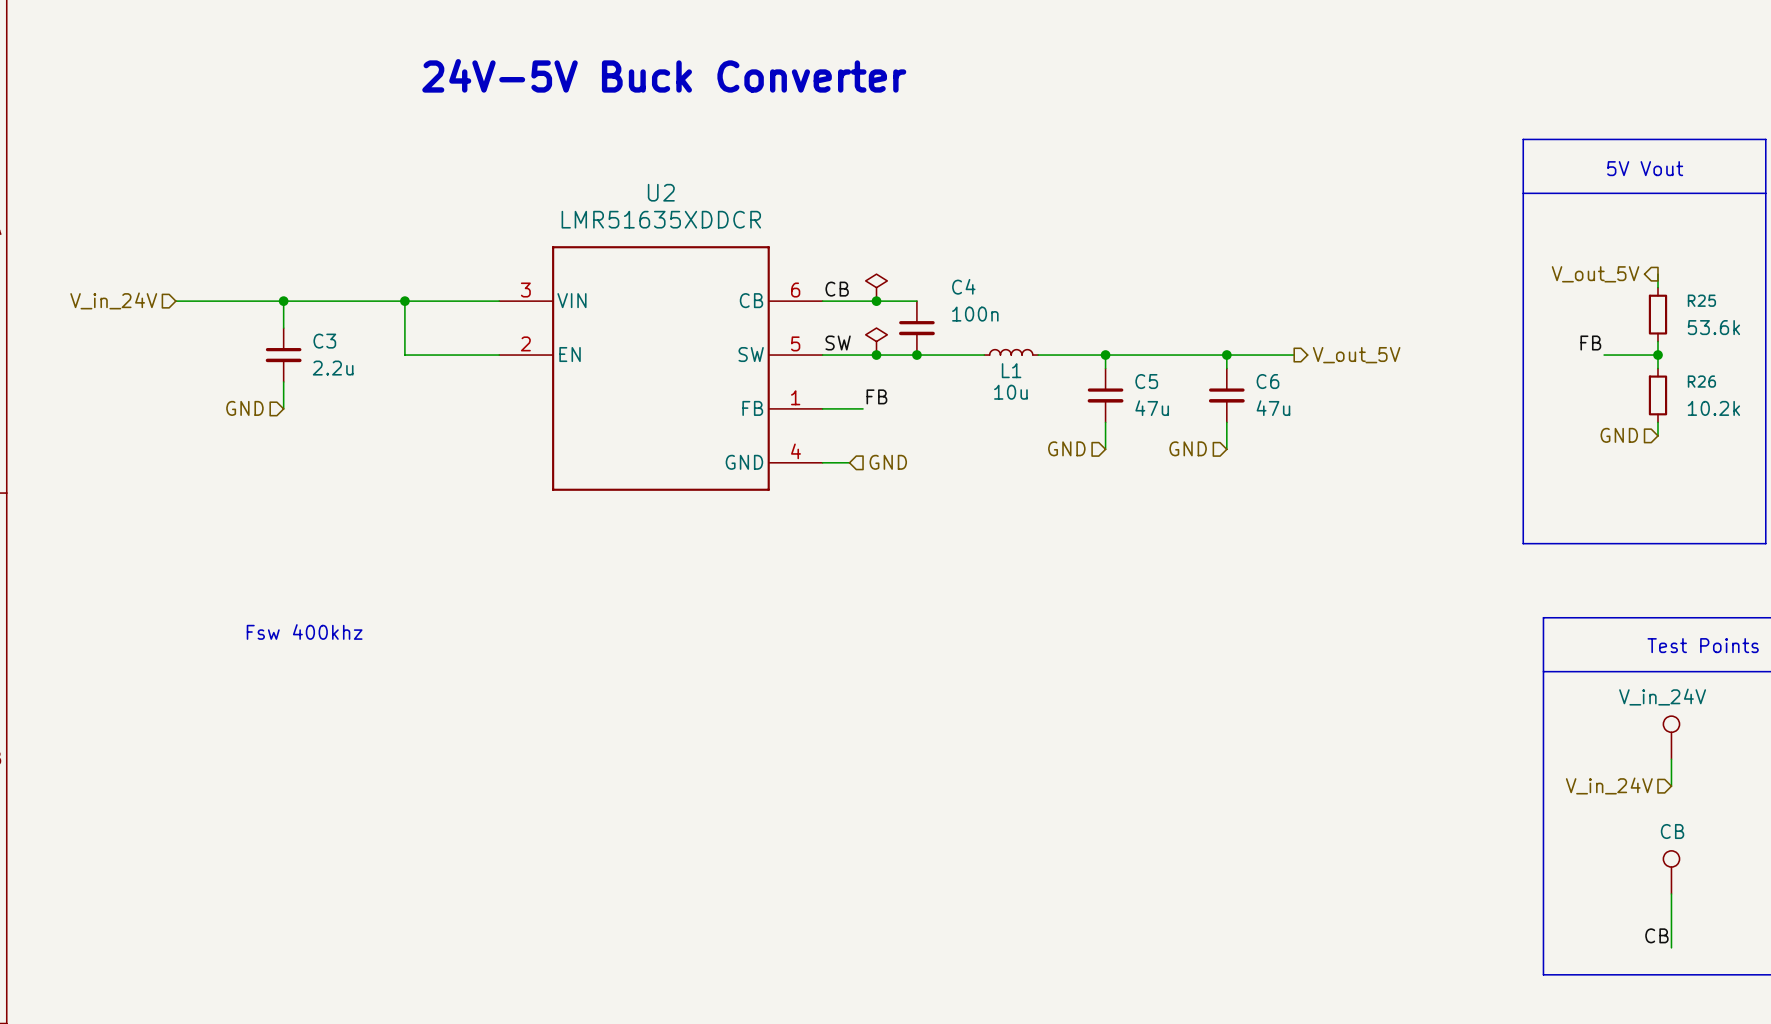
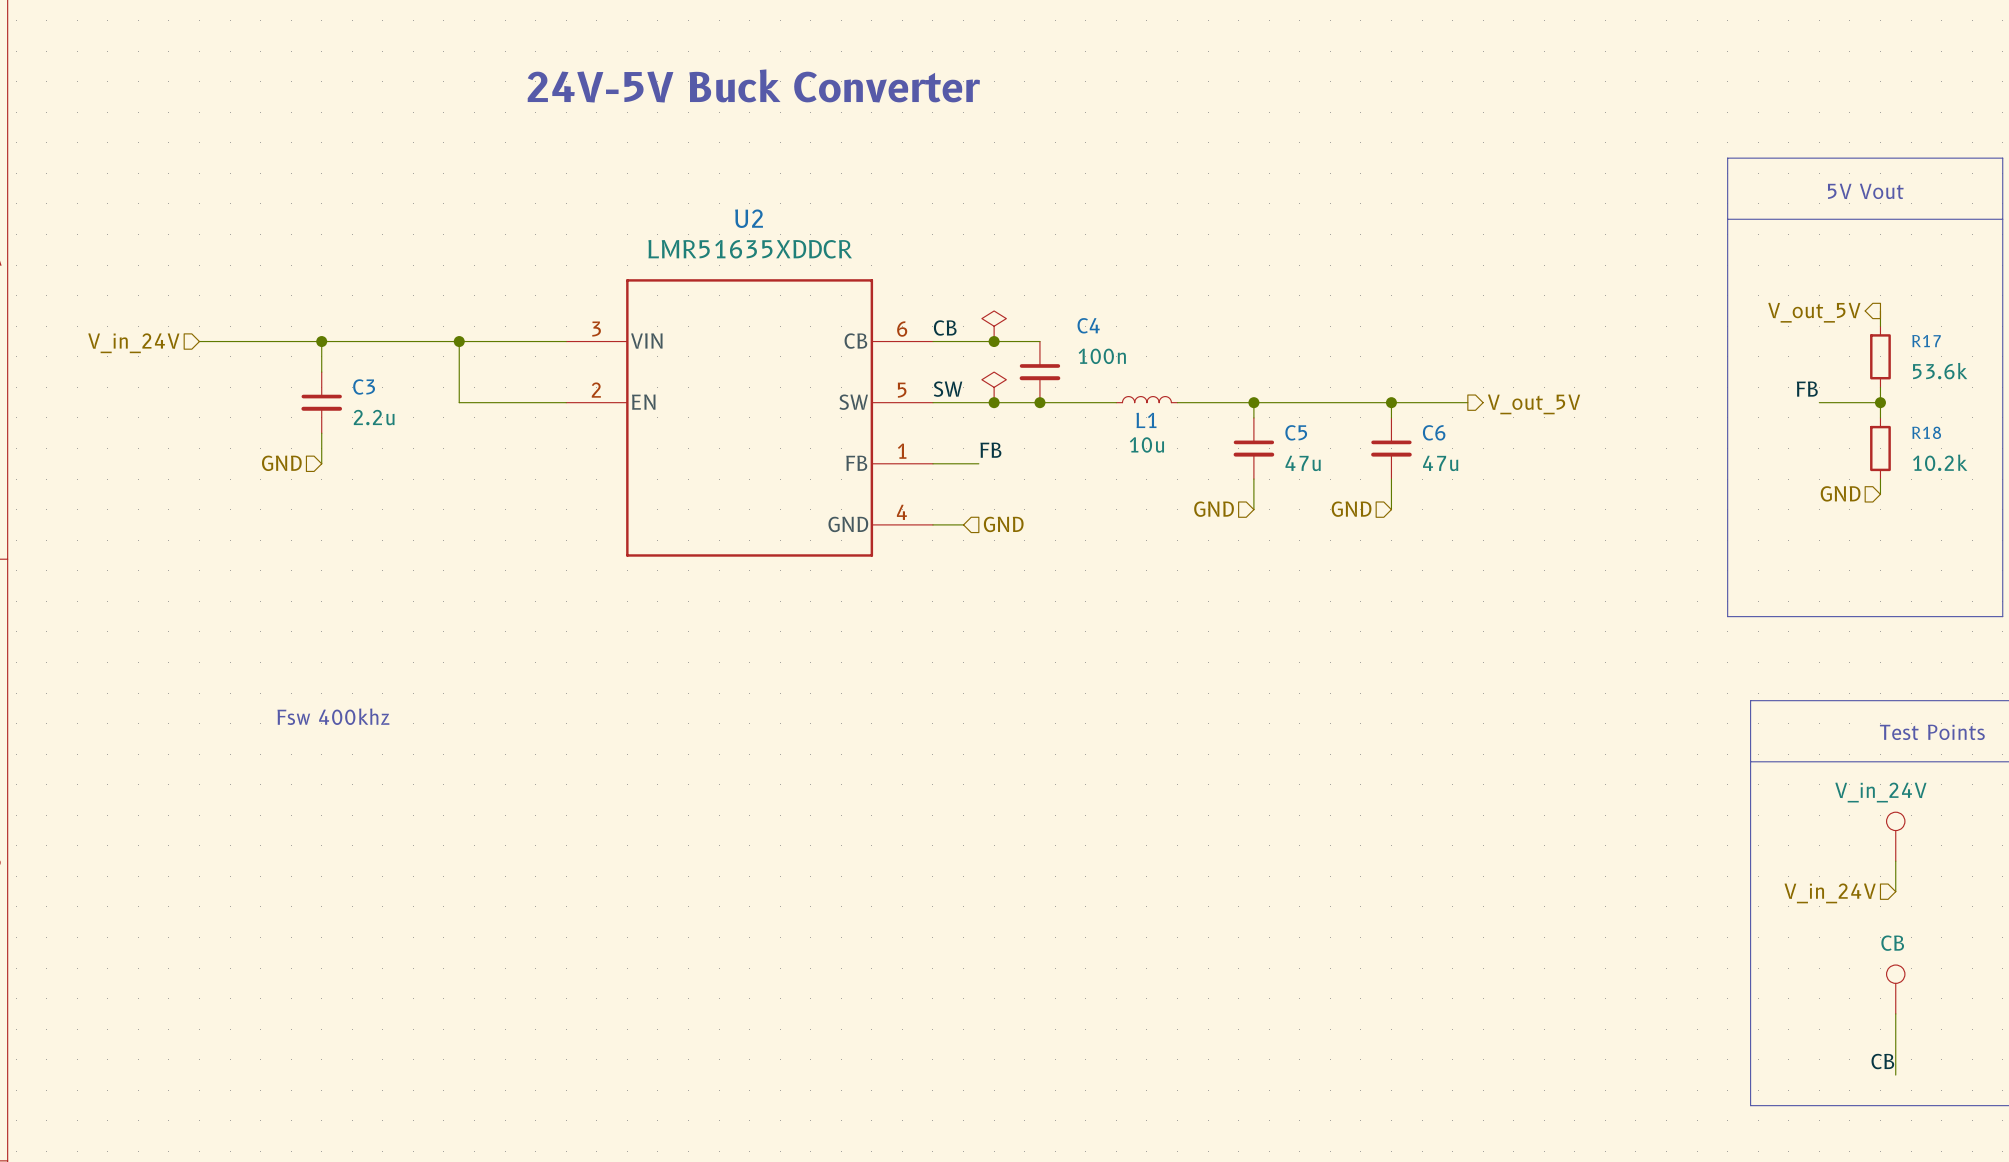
R25 name: R25 (1701, 300) -> R17 (1926, 341)
R26 name: R26 (1701, 381) -> R18 (1926, 432)

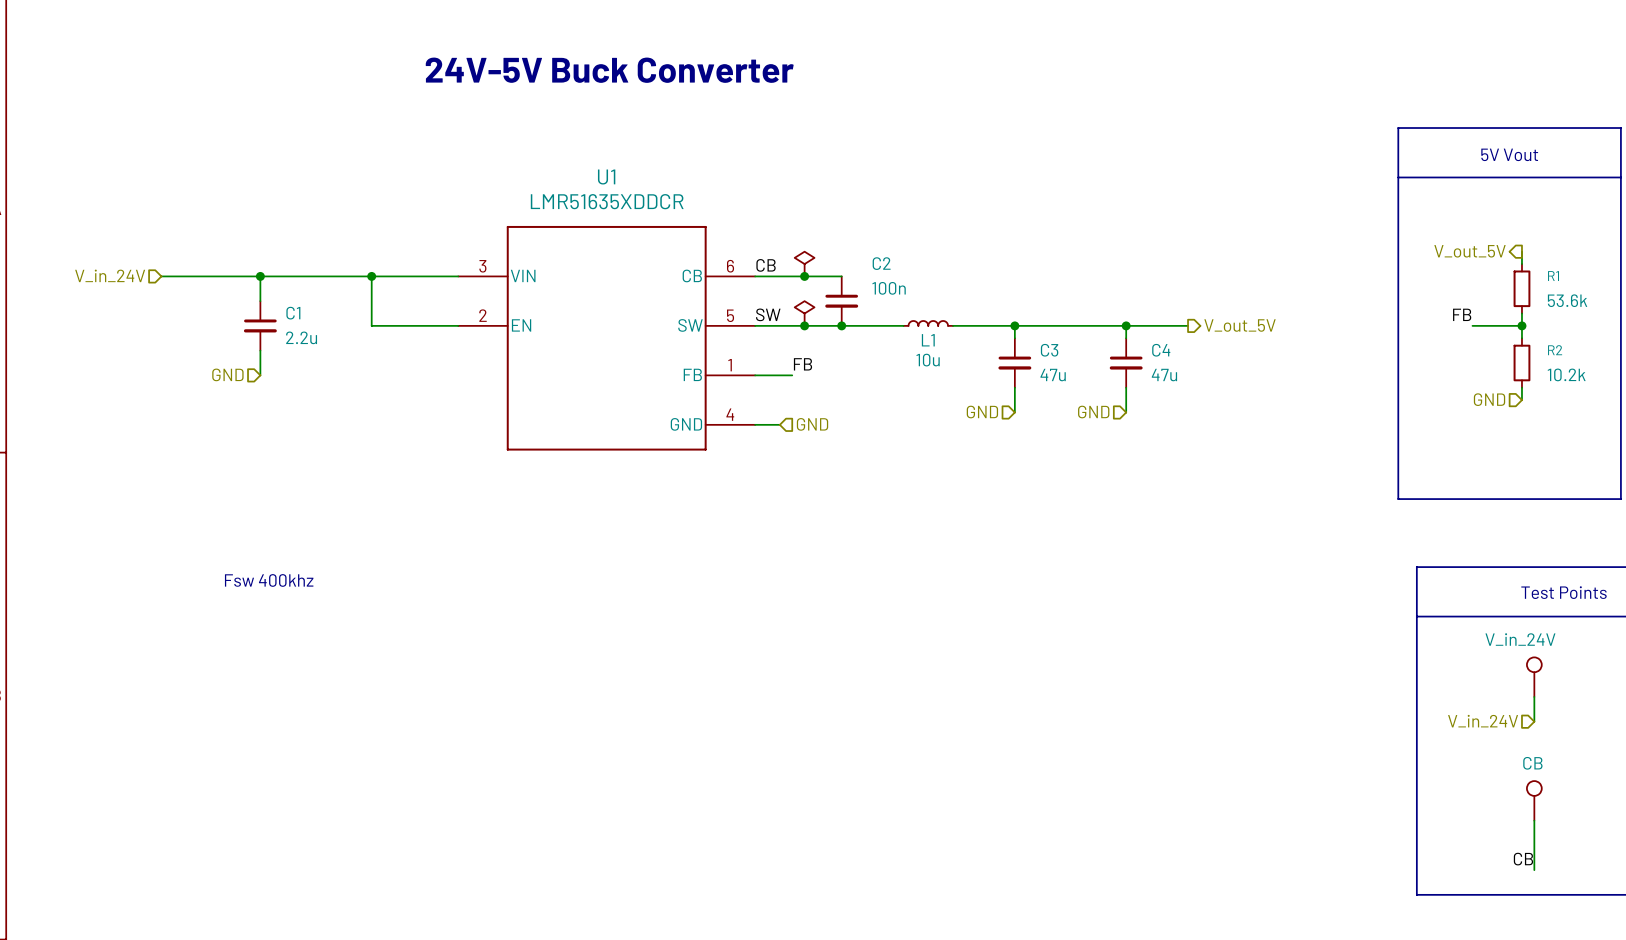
U2 name: U2 (749, 218) -> U1 (606, 177)
C4 name: C4 (1088, 325) -> C2 (881, 263)
R17 name: R17 (1926, 341) -> R1 (1553, 276)
C3 name: C3 (364, 386) -> C1 (293, 313)
C5 name: C5 (1296, 432) -> C3 (1049, 350)
C6 name: C6 (1434, 432) -> C4 (1161, 350)
R18 name: R18 (1926, 432) -> R2 (1555, 350)

